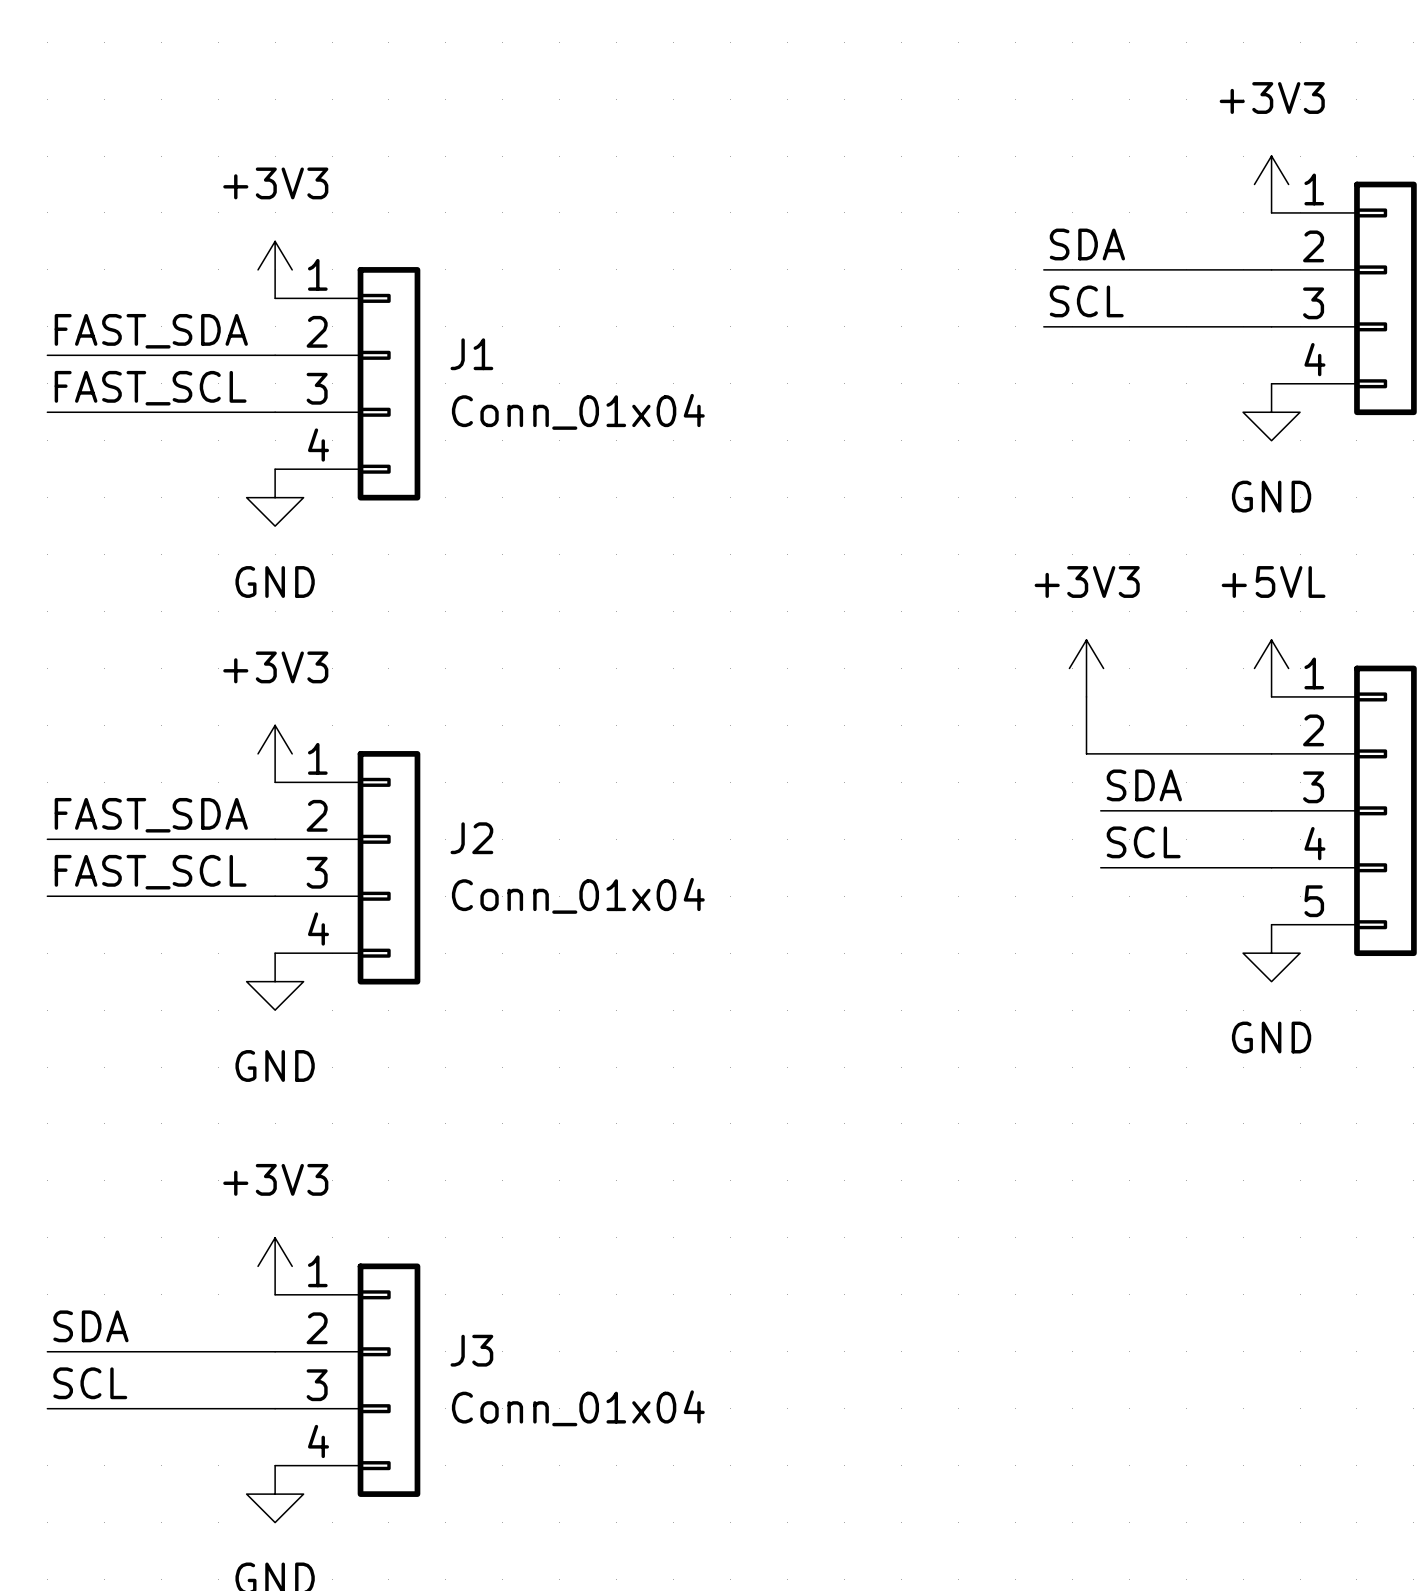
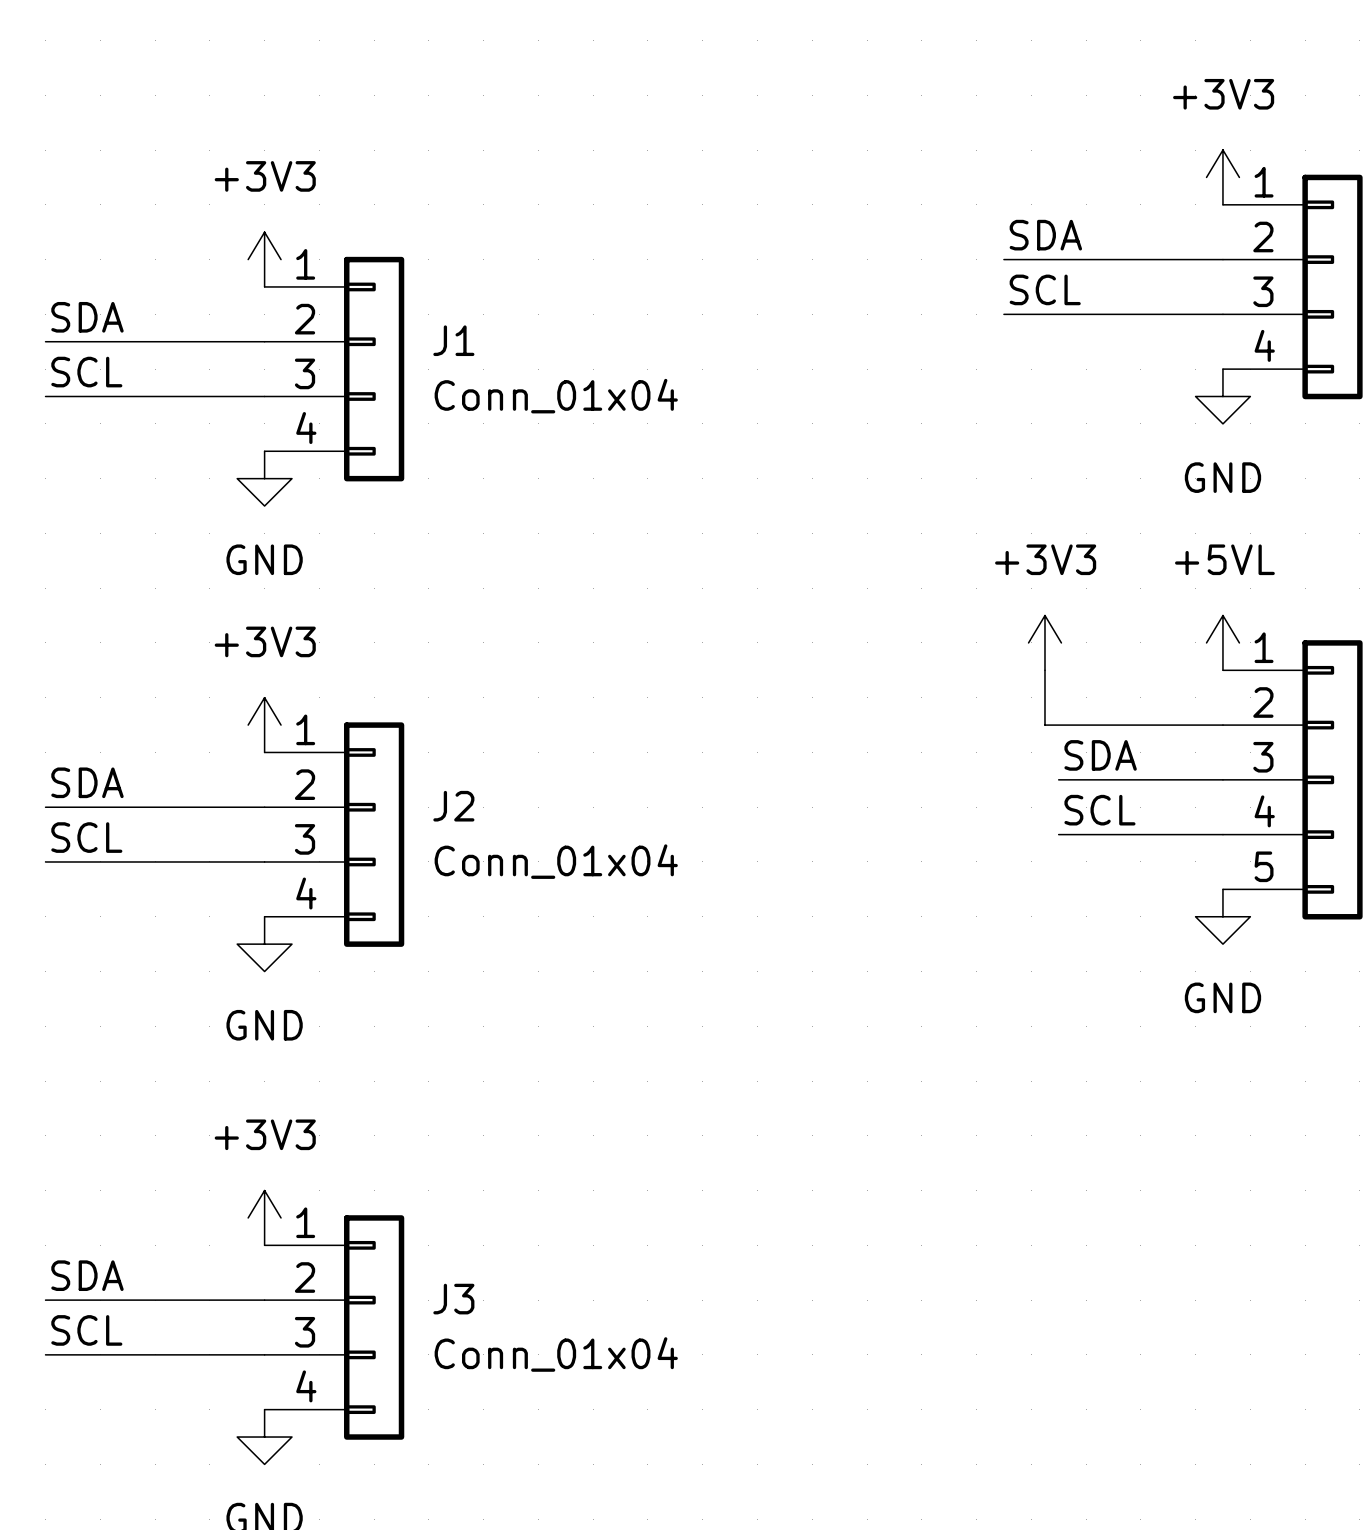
label: FAST_SDA (151, 331) -> SDA (87, 317)
label: FAST_SCL (150, 388) -> SCL (86, 372)
label: FAST_SDA (151, 815) -> SDA (87, 782)
label: FAST_SCL (150, 872) -> SCL (86, 837)

